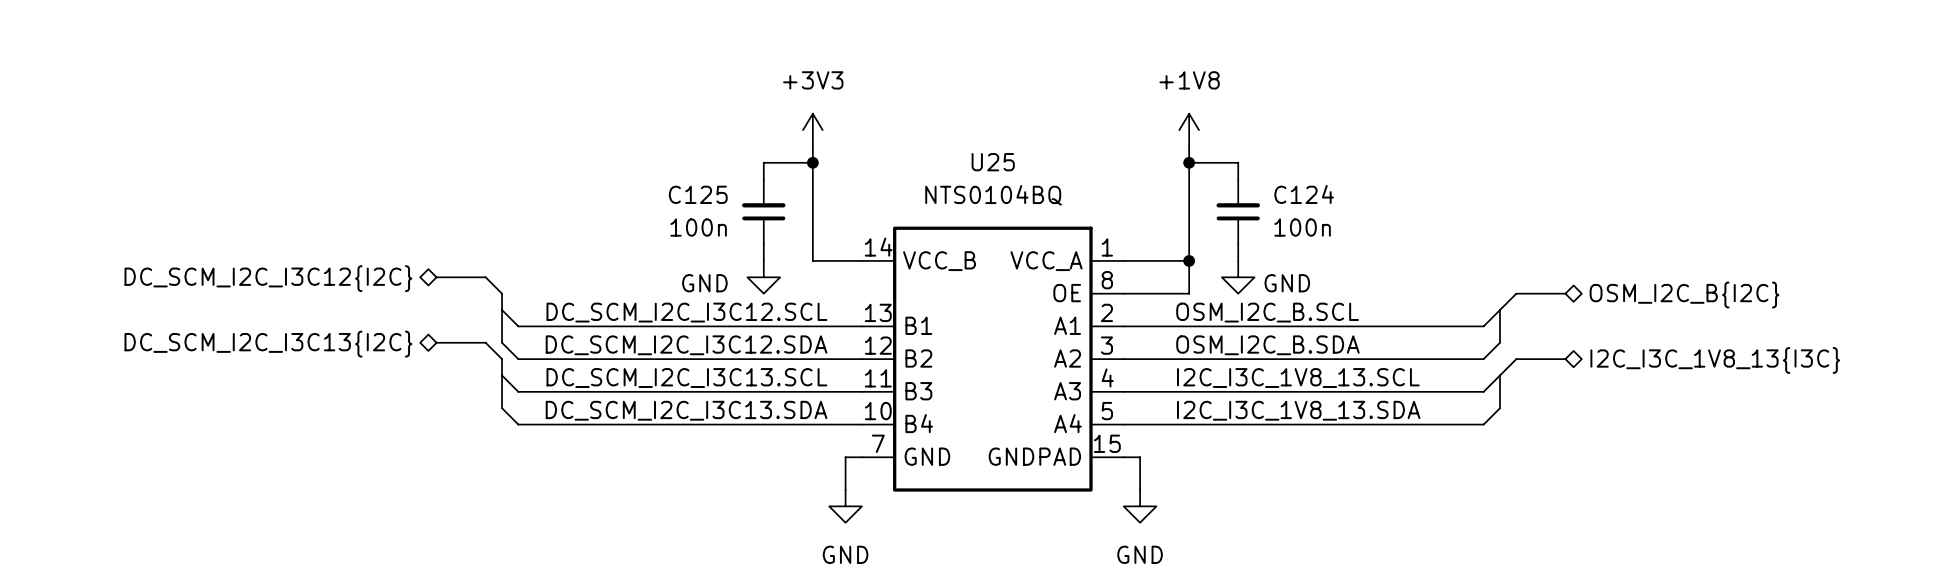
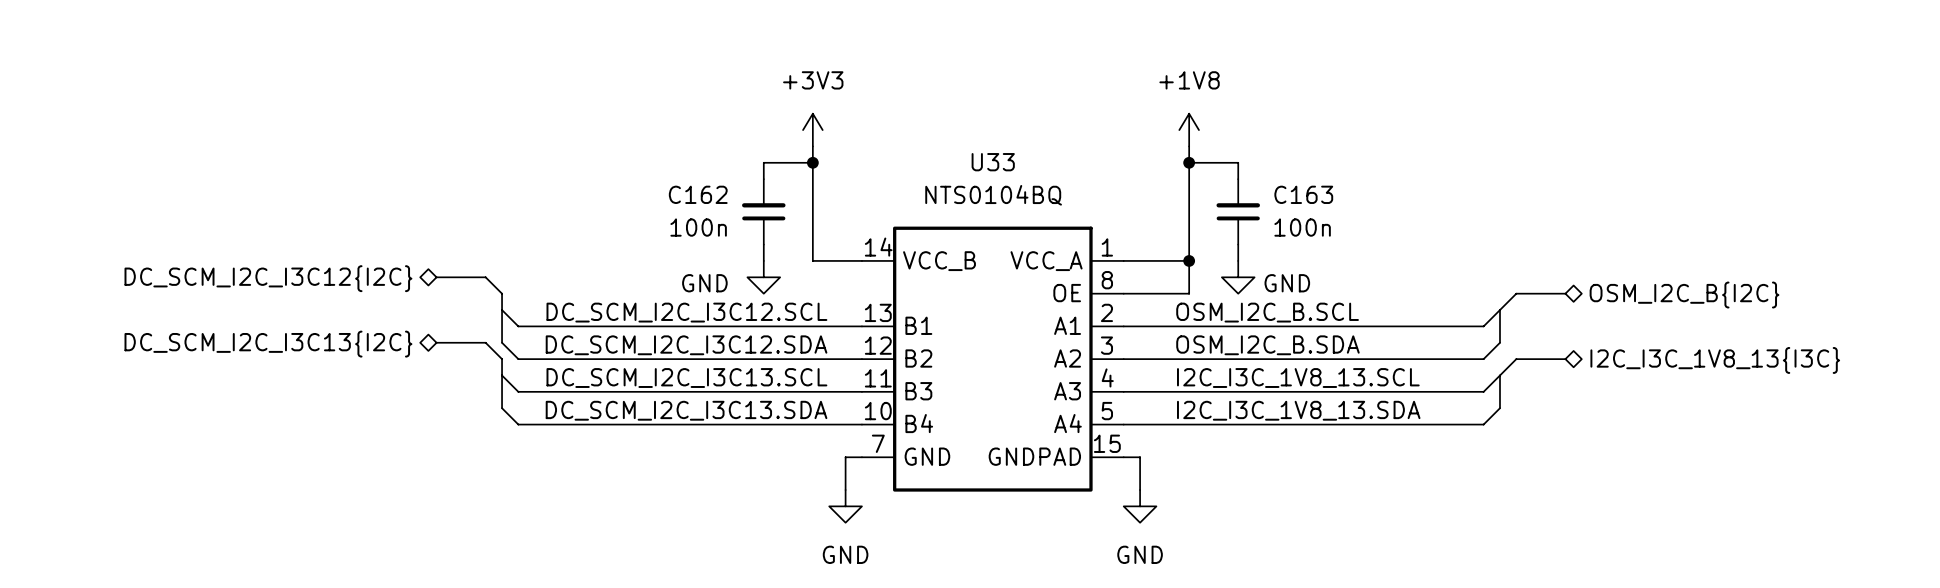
U25 name: U25 (993, 162) -> U33 (993, 162)
C125 name: C125 (698, 194) -> C162 (698, 194)
C124 name: C124 (1304, 194) -> C163 (1303, 194)

